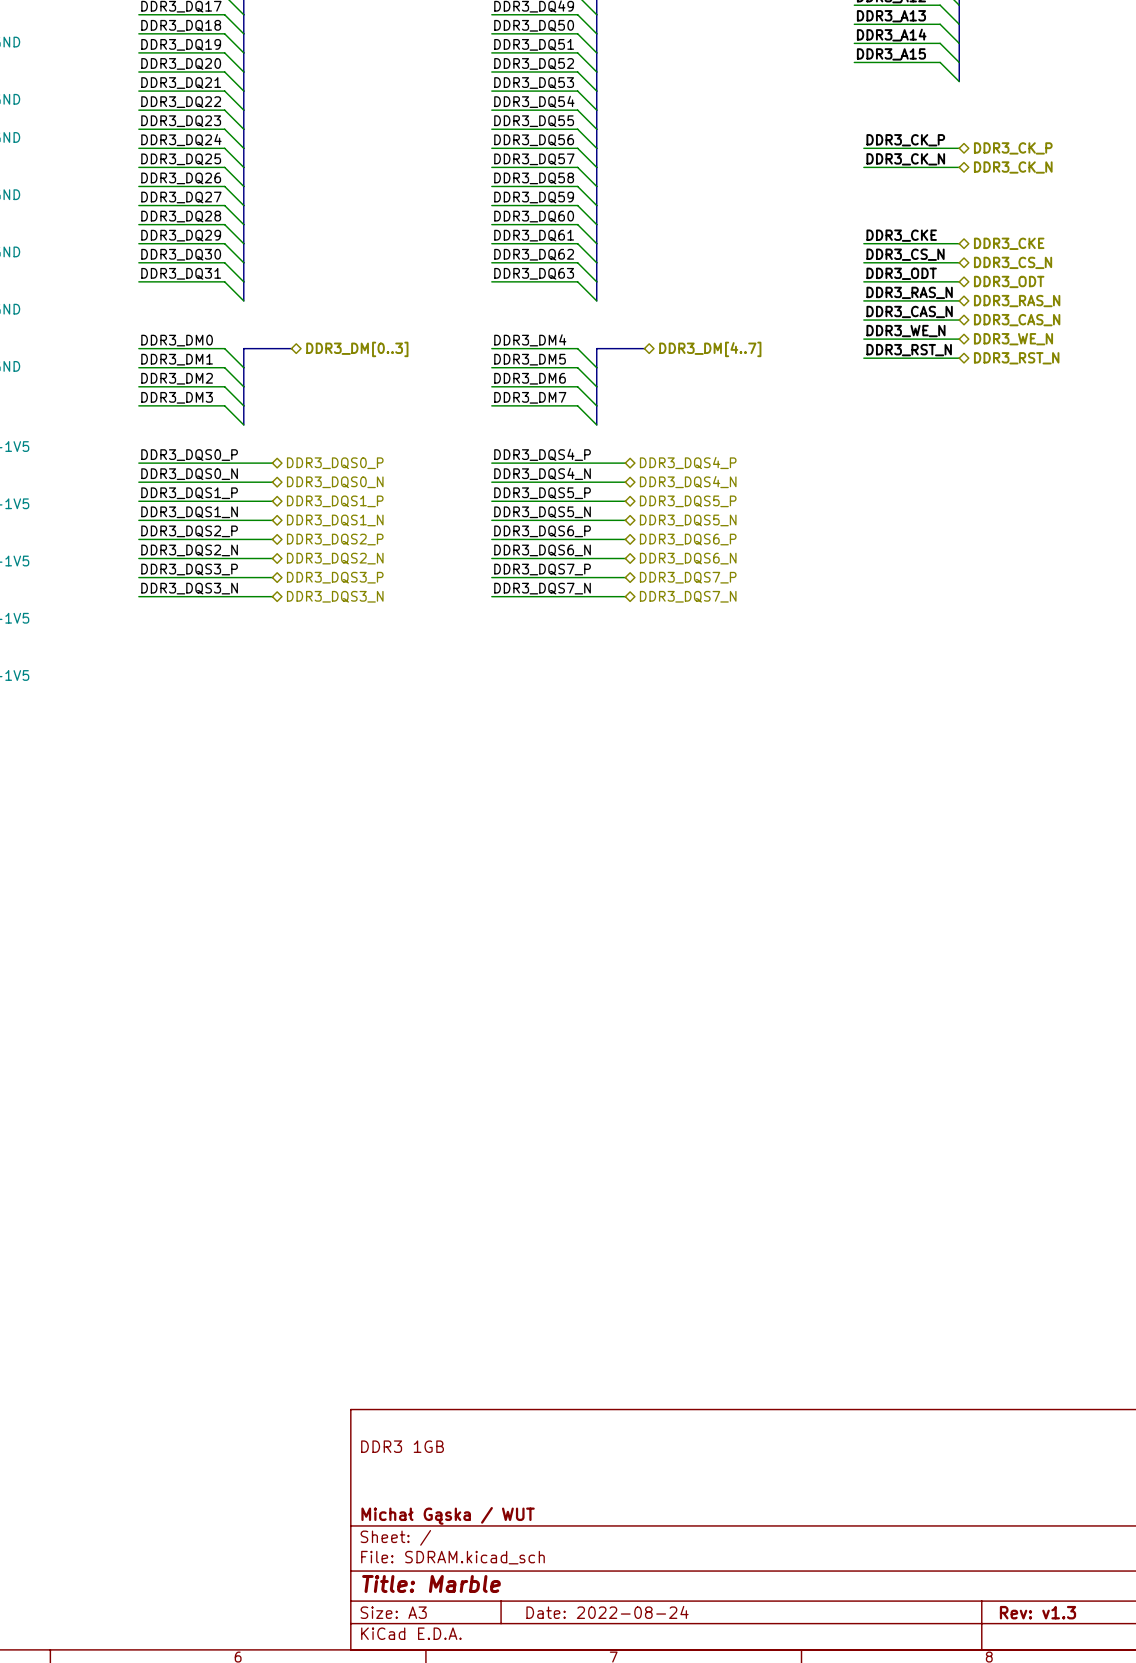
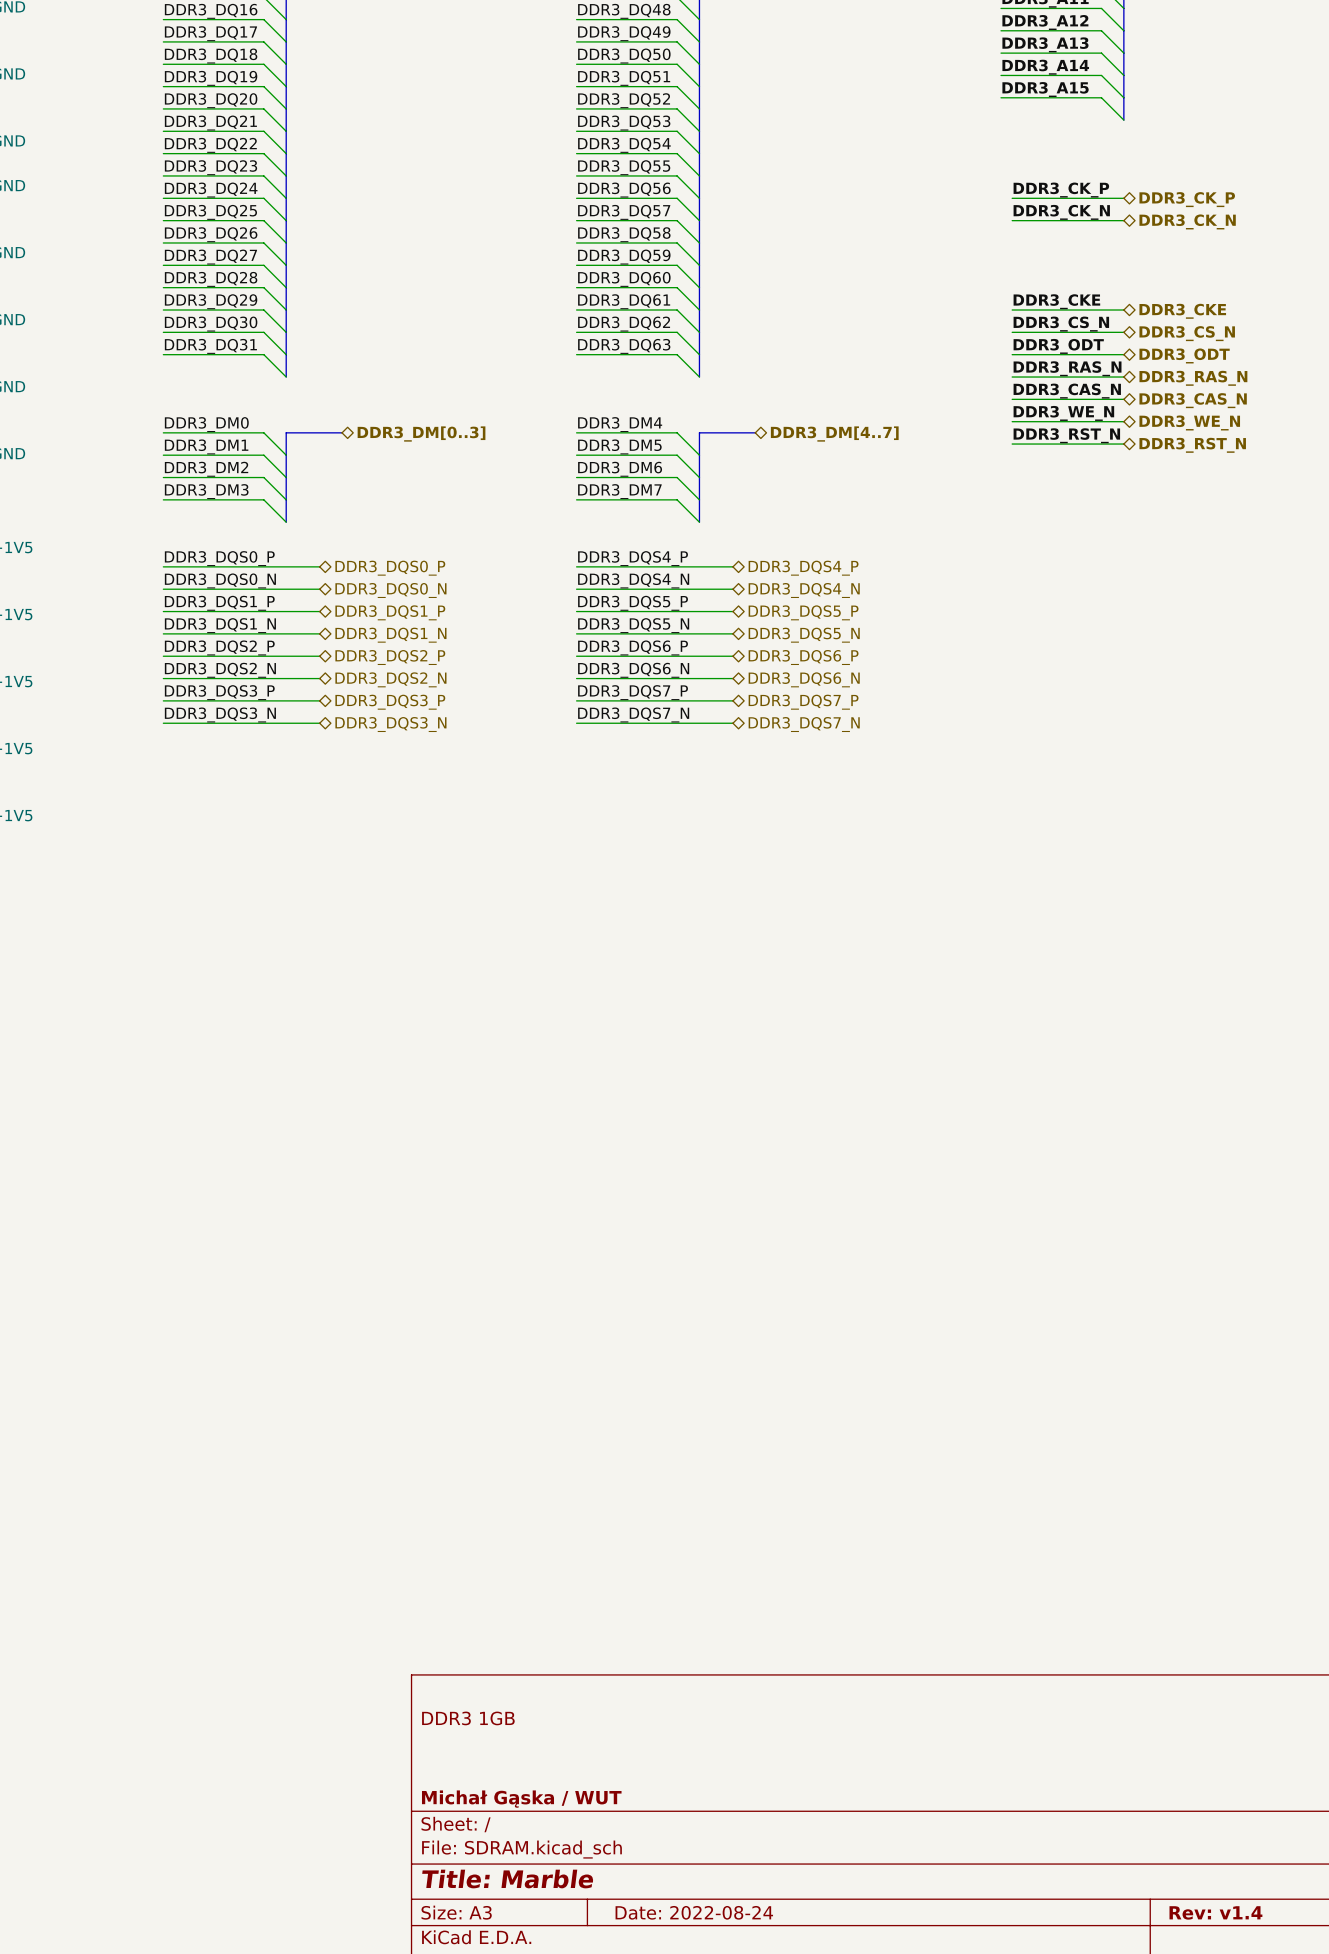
title block: Rev: v1.3 (1037, 1612) -> Rev: v1.4 (1215, 1912)

